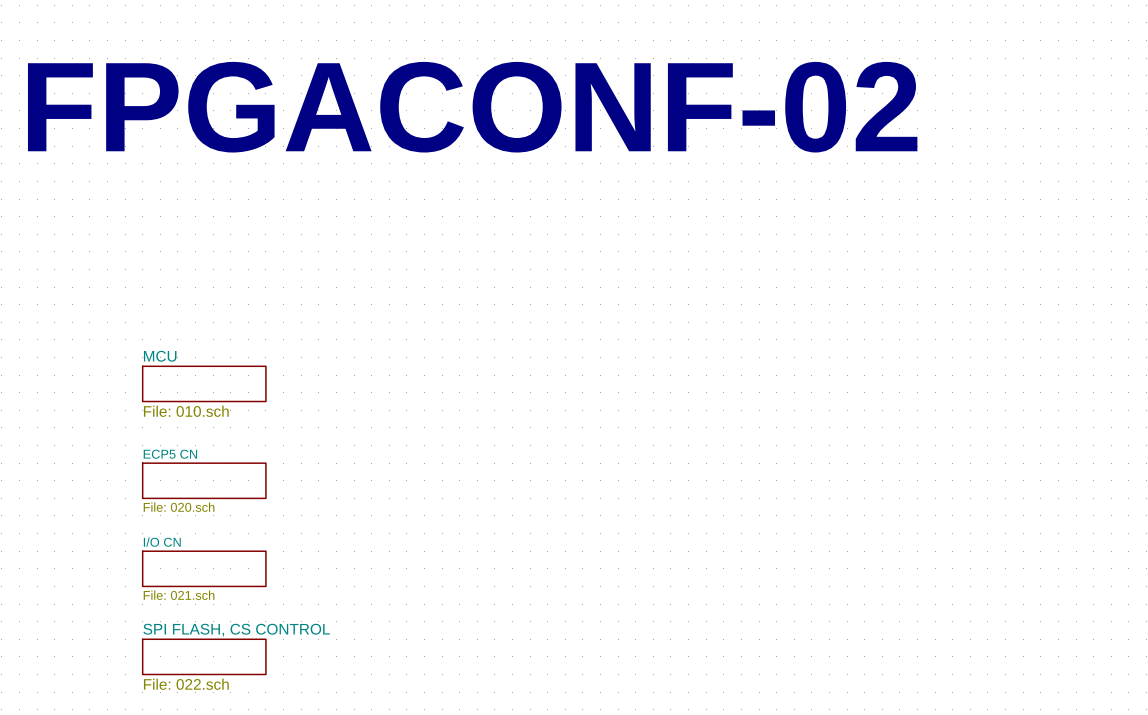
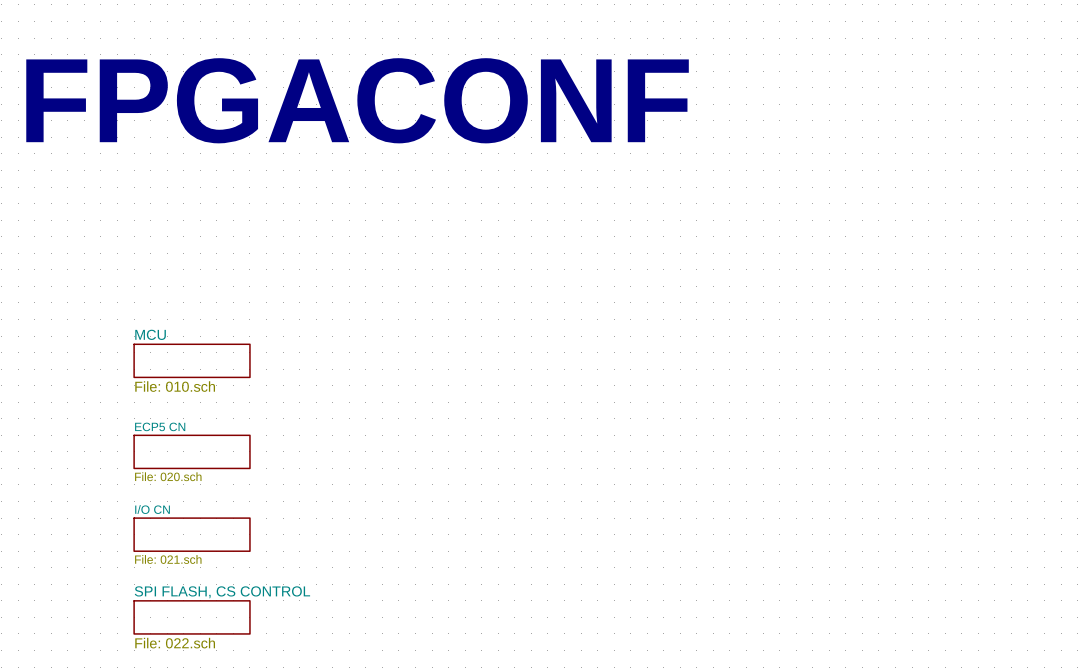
text: FPGACONF-02 (472, 107) -> FPGACONF (357, 100)

